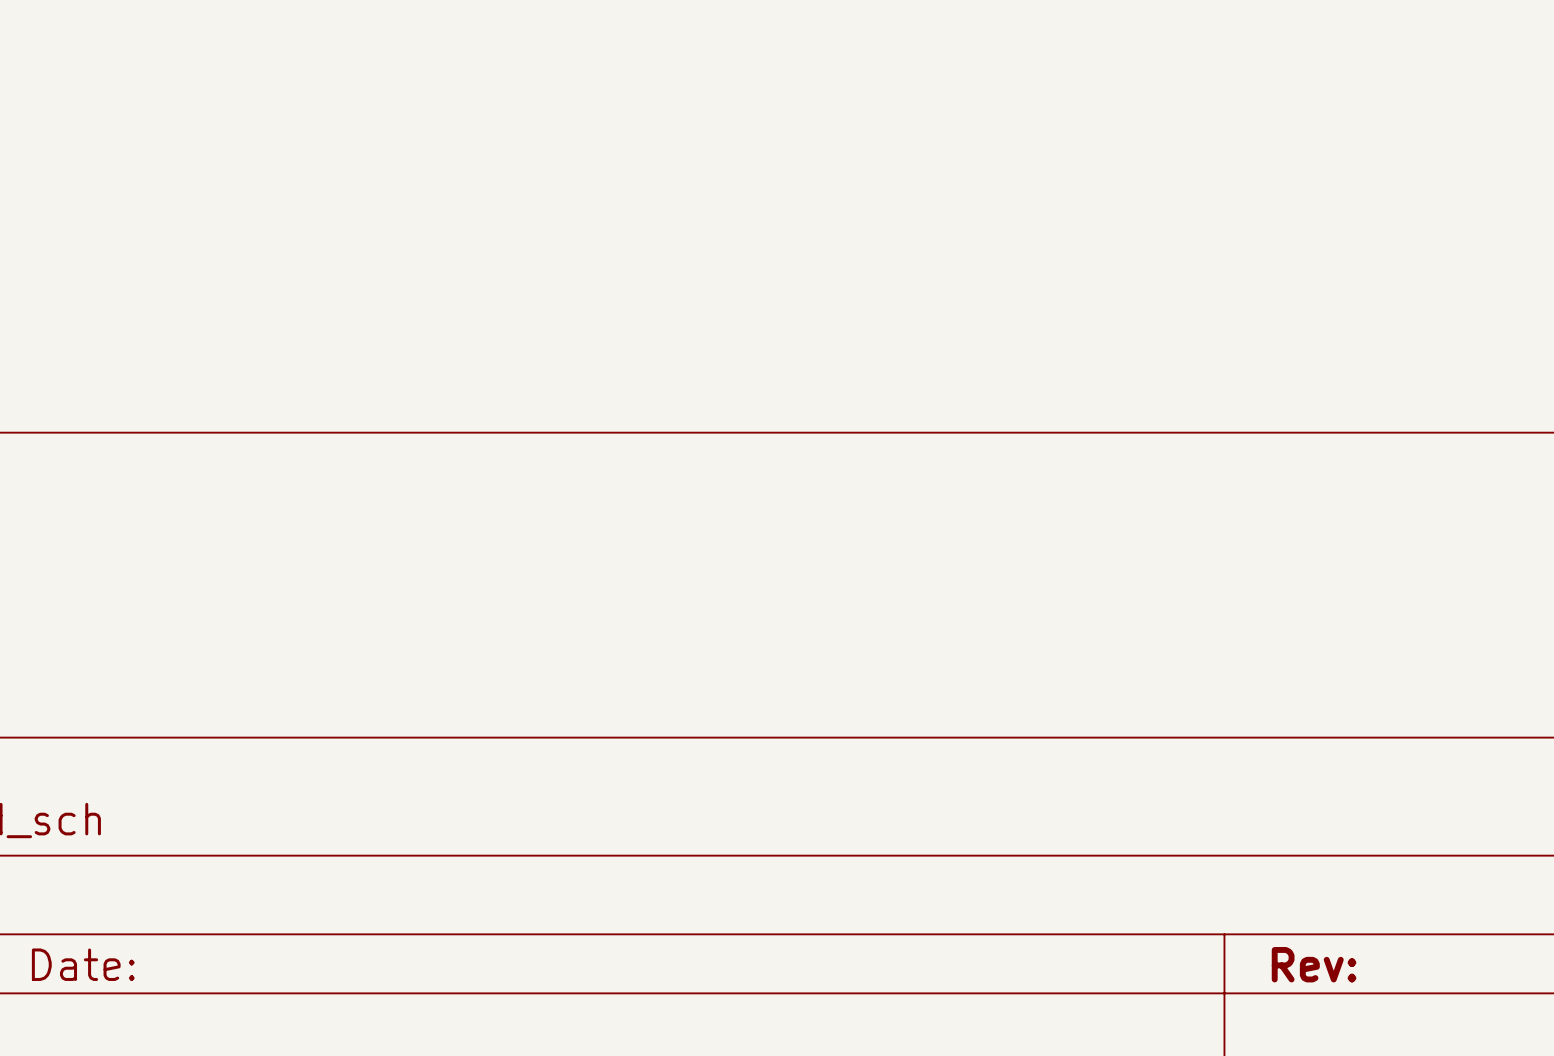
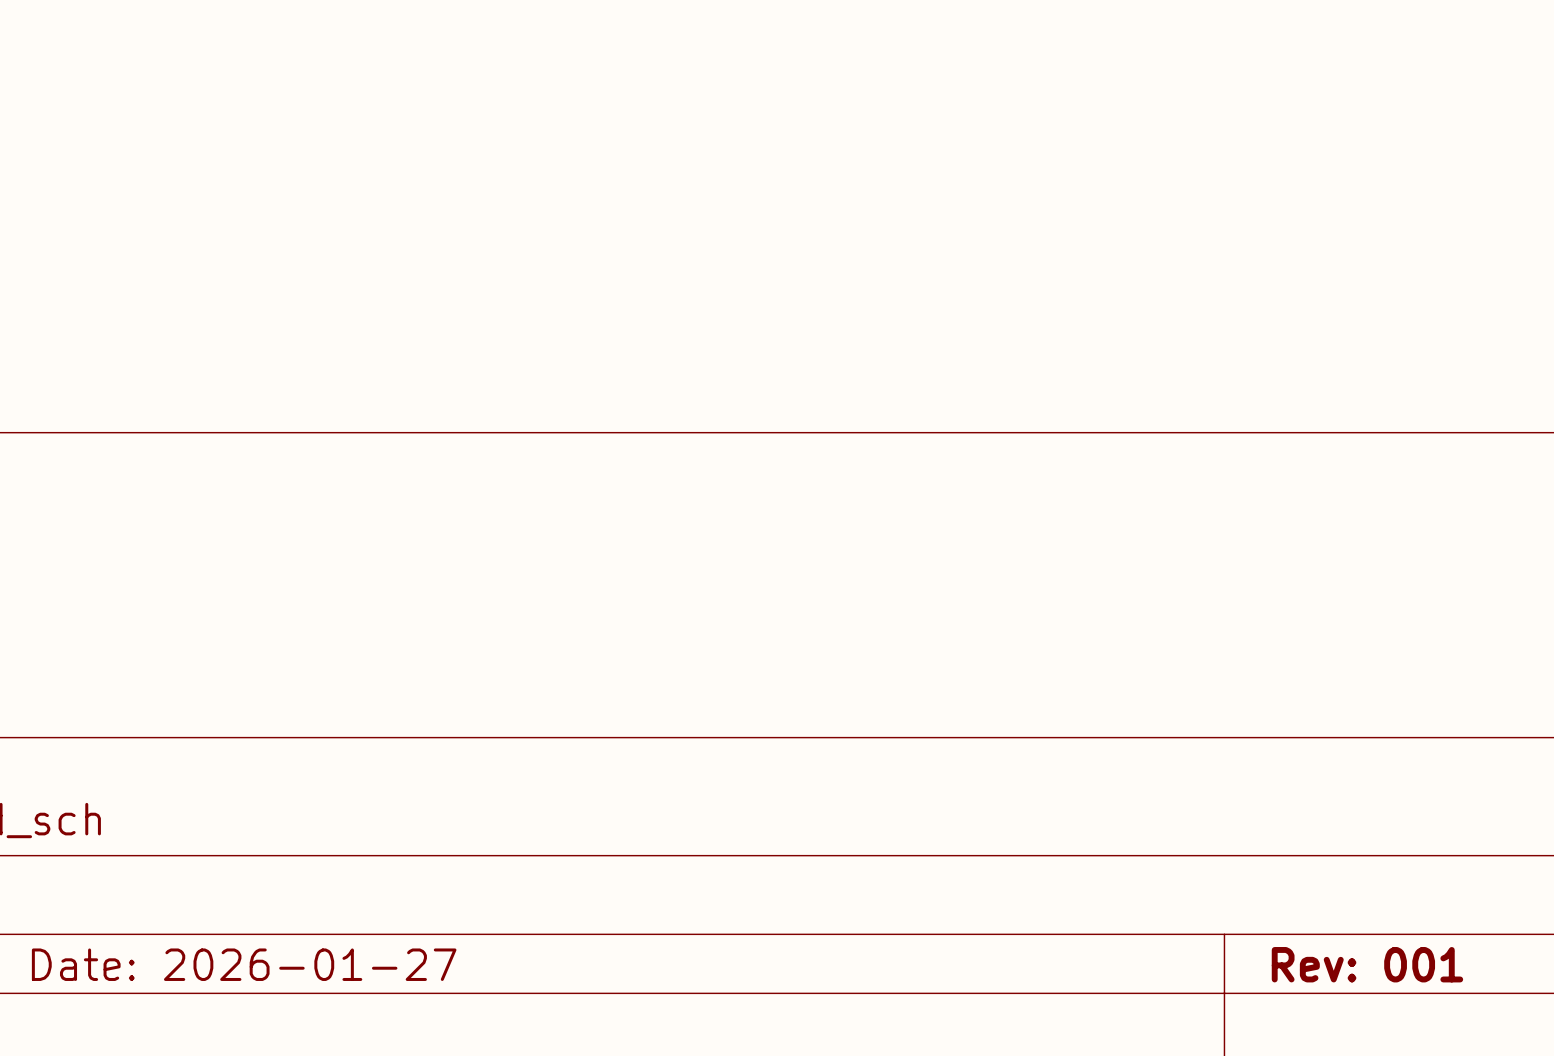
title block: Date: (83, 964) -> Date: 2026-01-27 (244, 964)
title block: Rev: (1314, 964) -> Rev: 001 (1367, 964)

